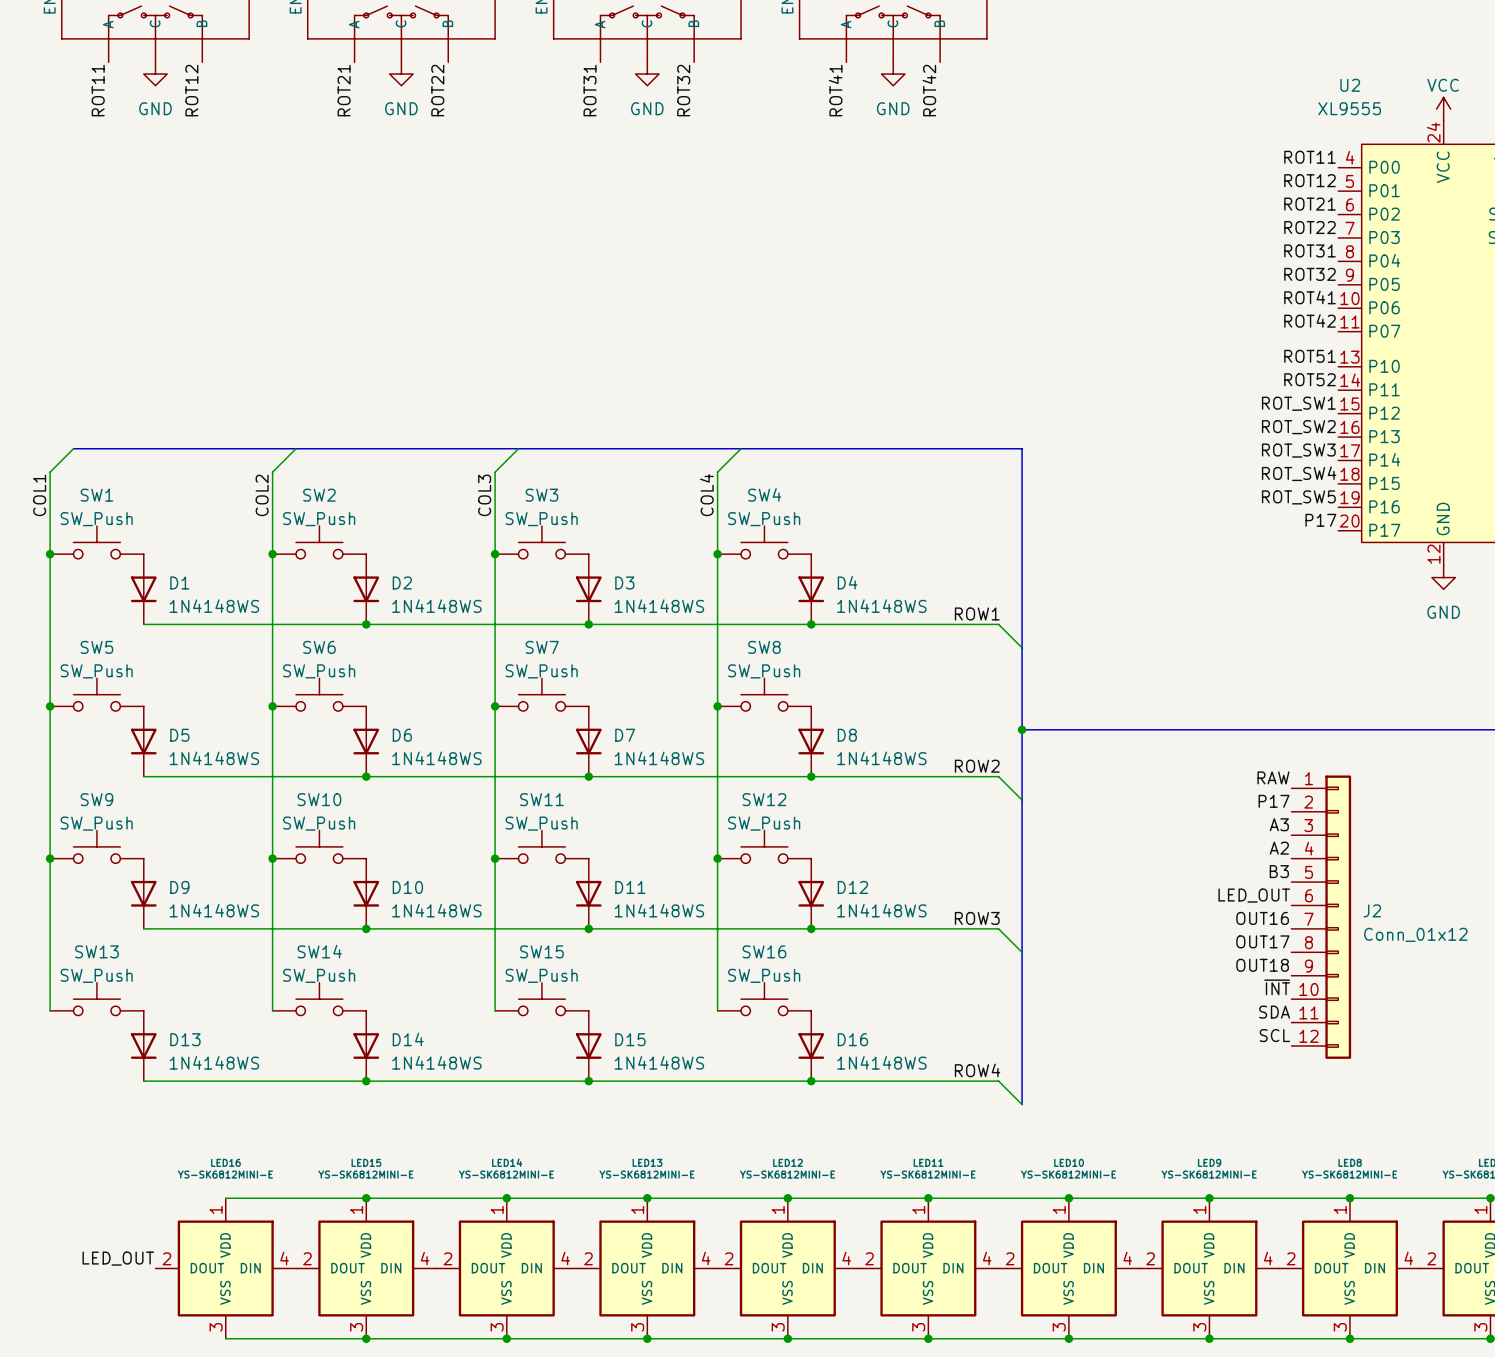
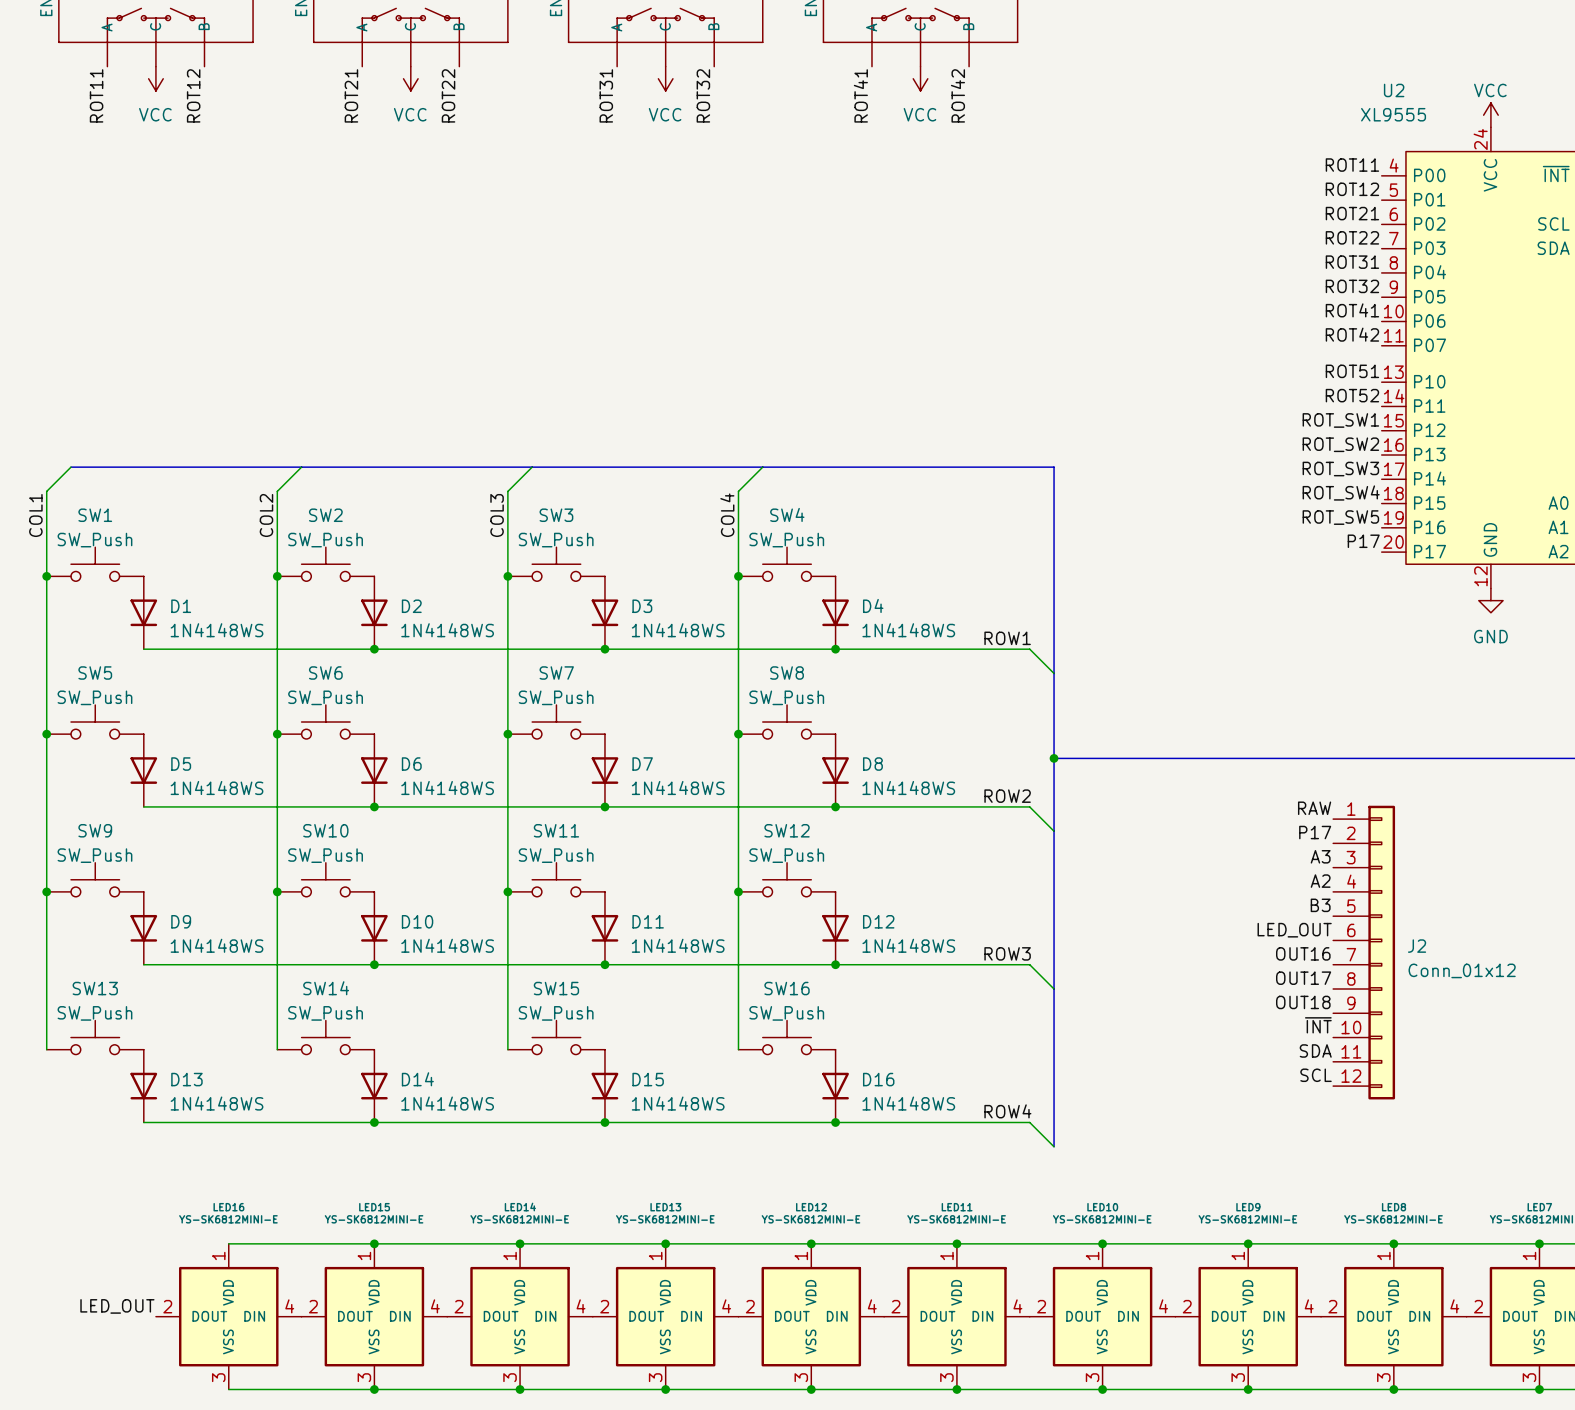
power symbol: GND (155, 74) -> VCC (155, 78)
power symbol: GND (401, 74) -> VCC (410, 78)
power symbol: GND (647, 74) -> VCC (665, 78)
power symbol: GND (893, 74) -> VCC (920, 78)

